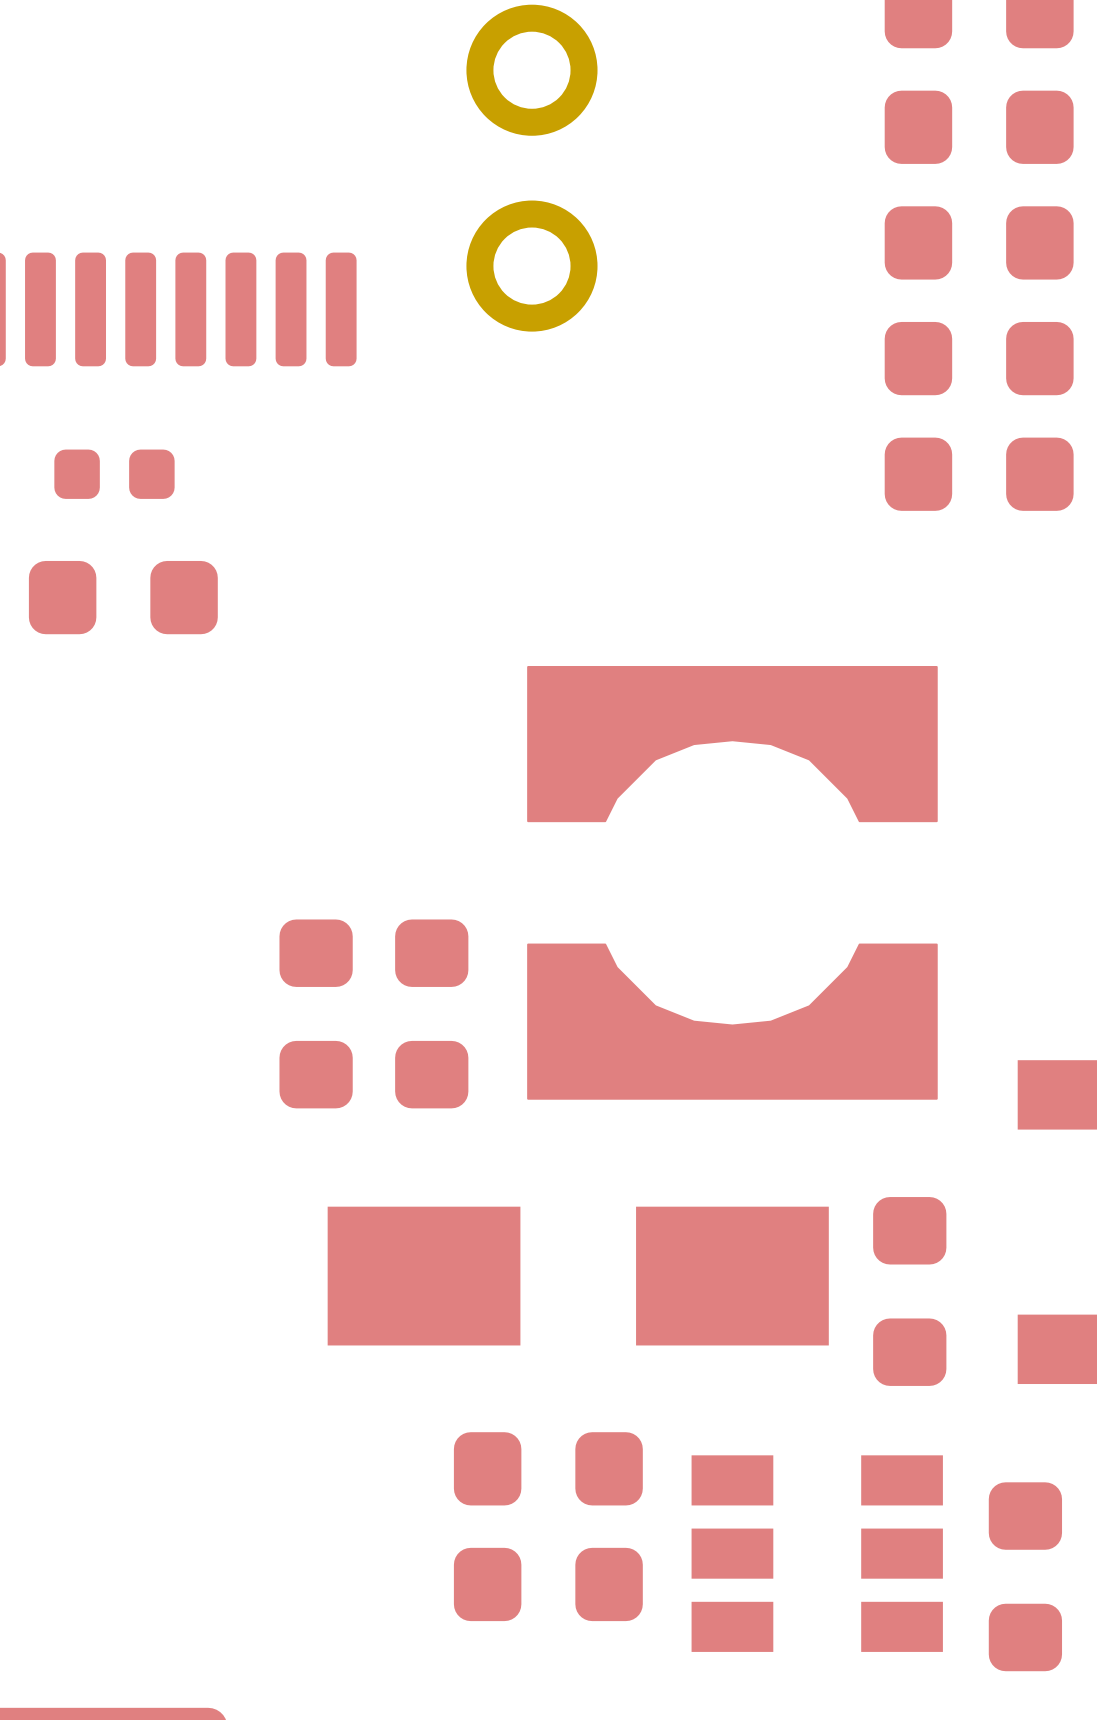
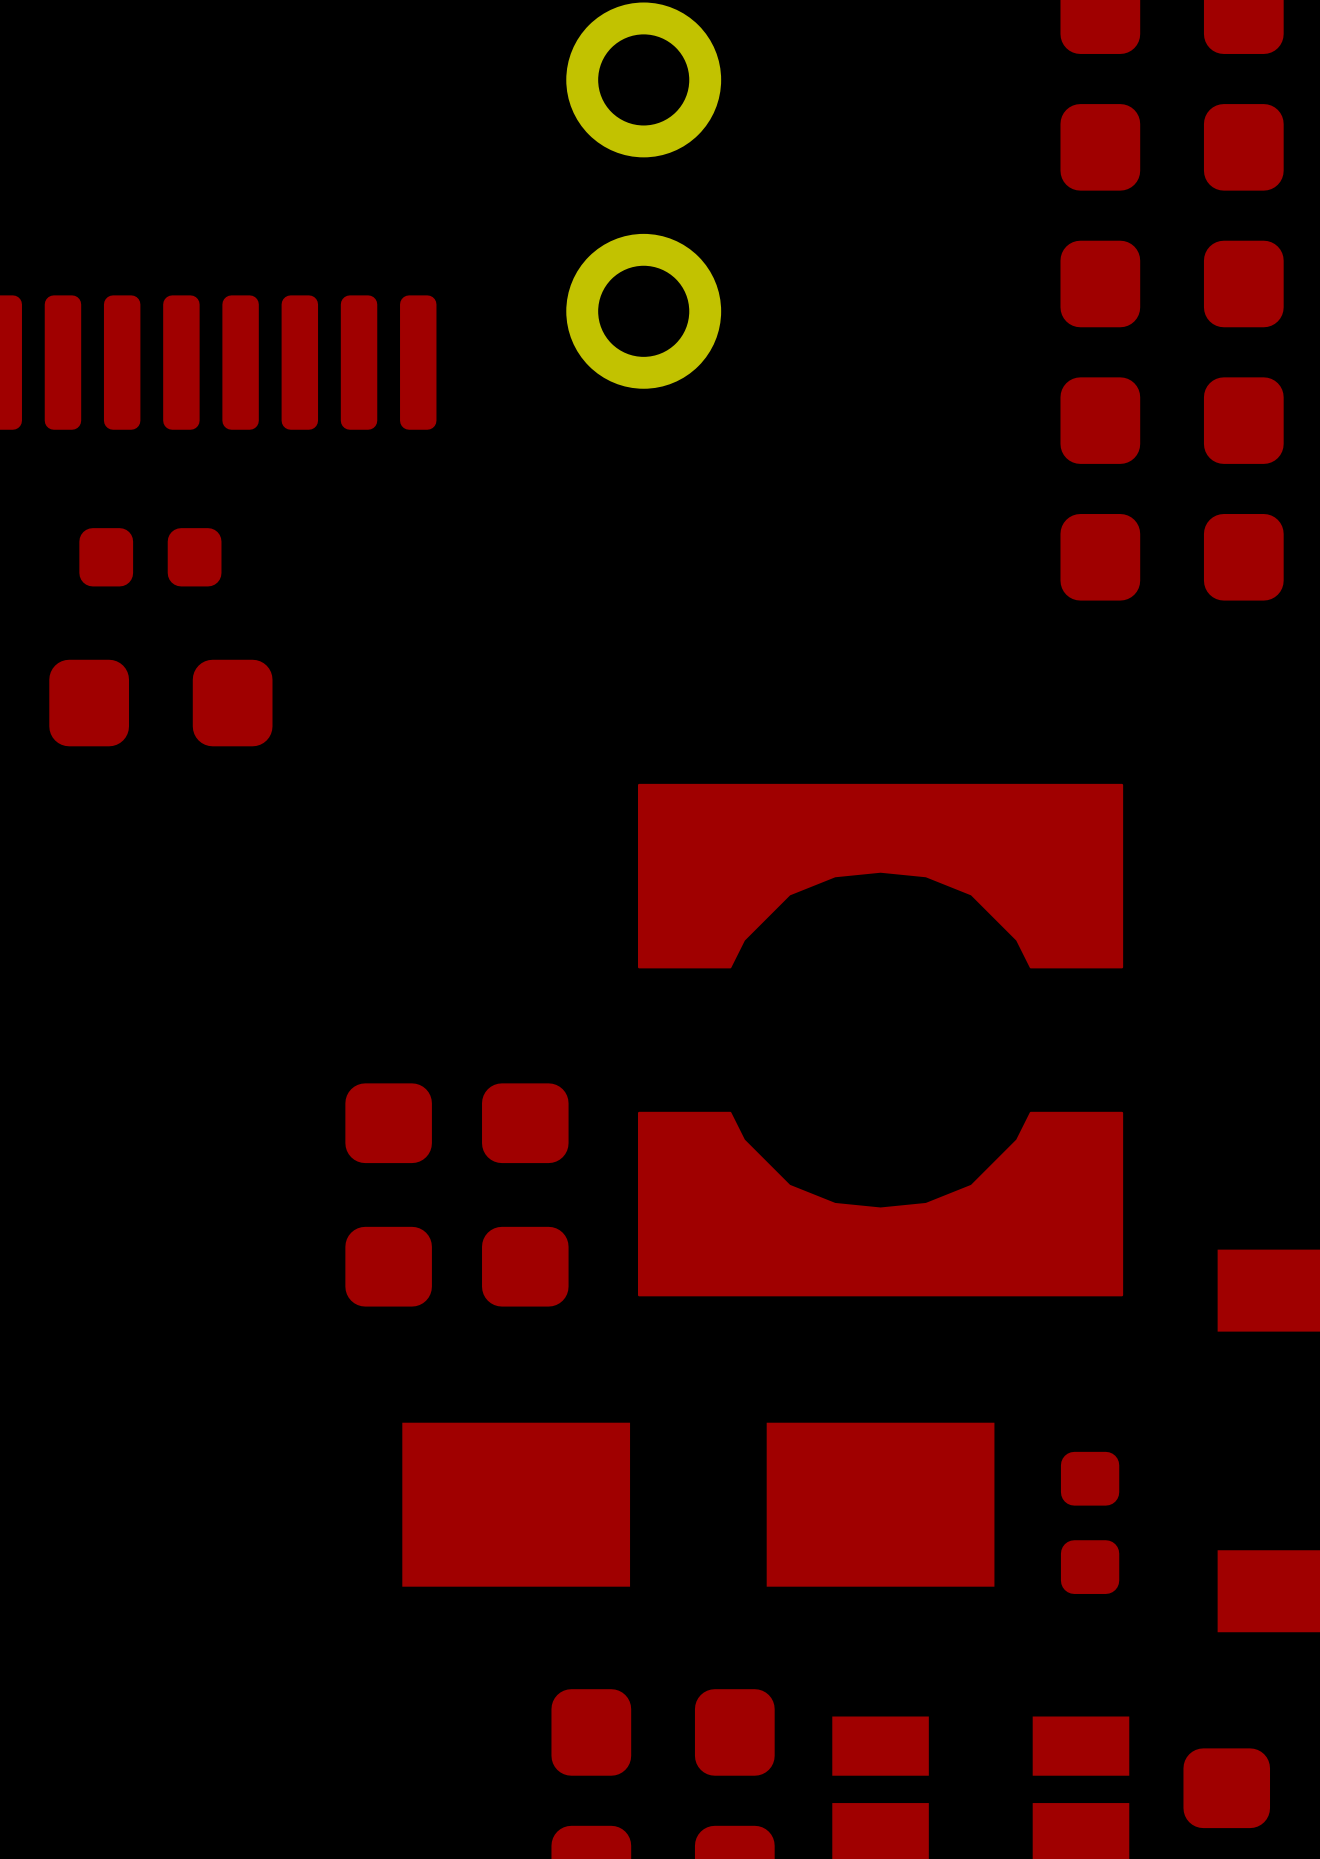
part footprint: [873, 1197, 947, 1386] -> [1060, 1451, 1120, 1594]

